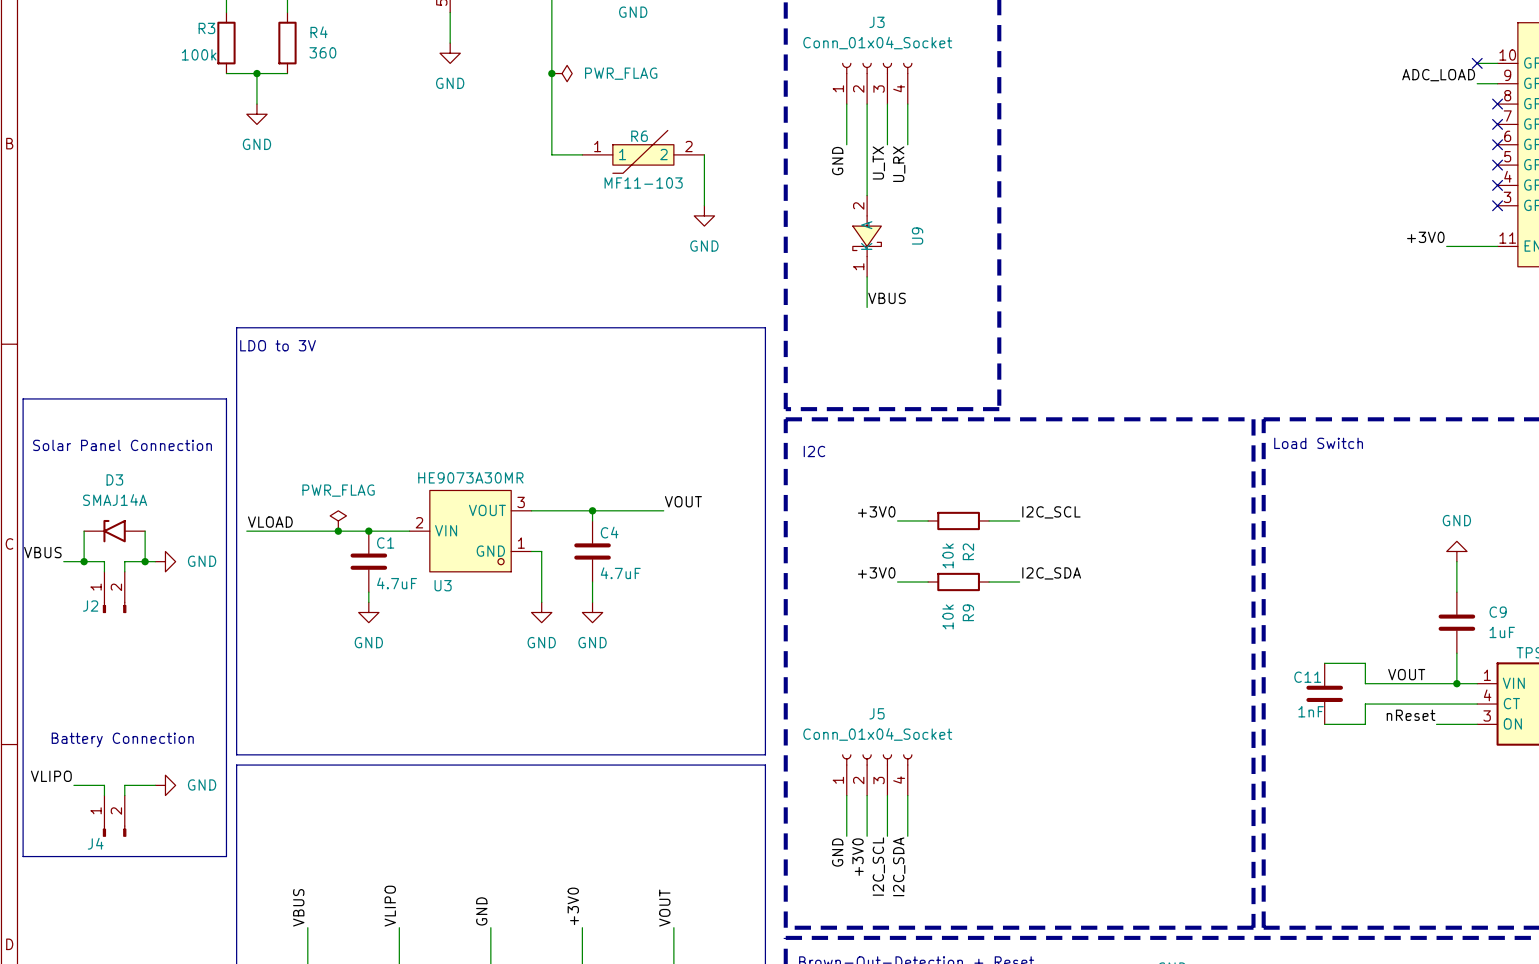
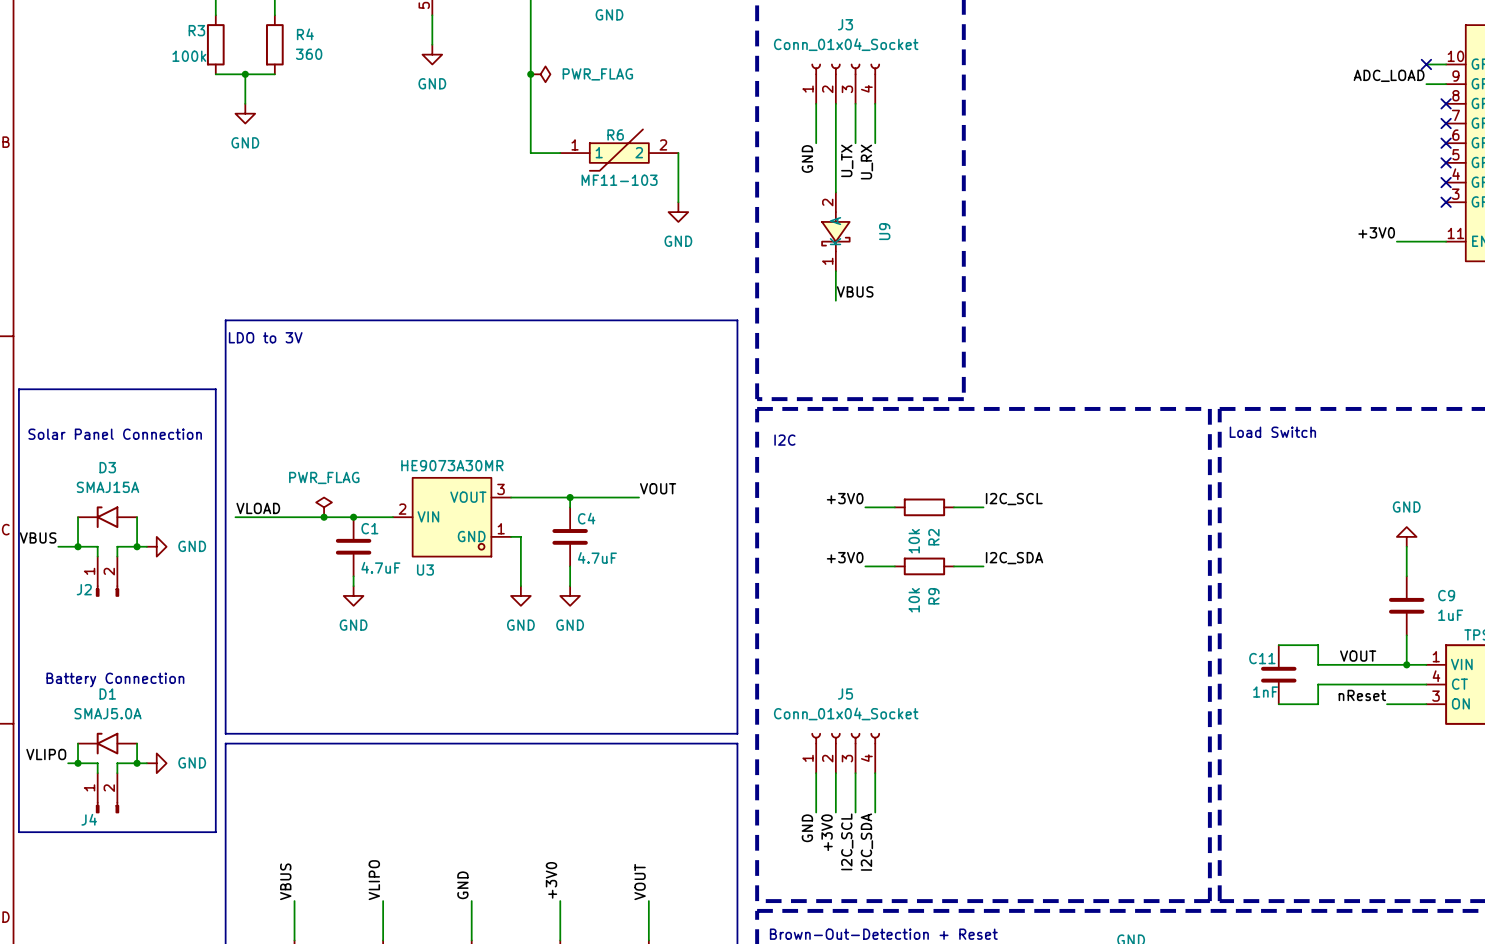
D3 value: SMAJ14A (115, 500) -> SMAJ15A (107, 487)
text position: Battery Connection (122, 739) -> Battery Connection (115, 679)
wire: none -> (78, 743) (78, 763)
D1: none -> SMAJ5.0A (107, 743)
wire: none -> (137, 743) (137, 763)
junction: none -> (78, 763)
junction: none -> (137, 763)

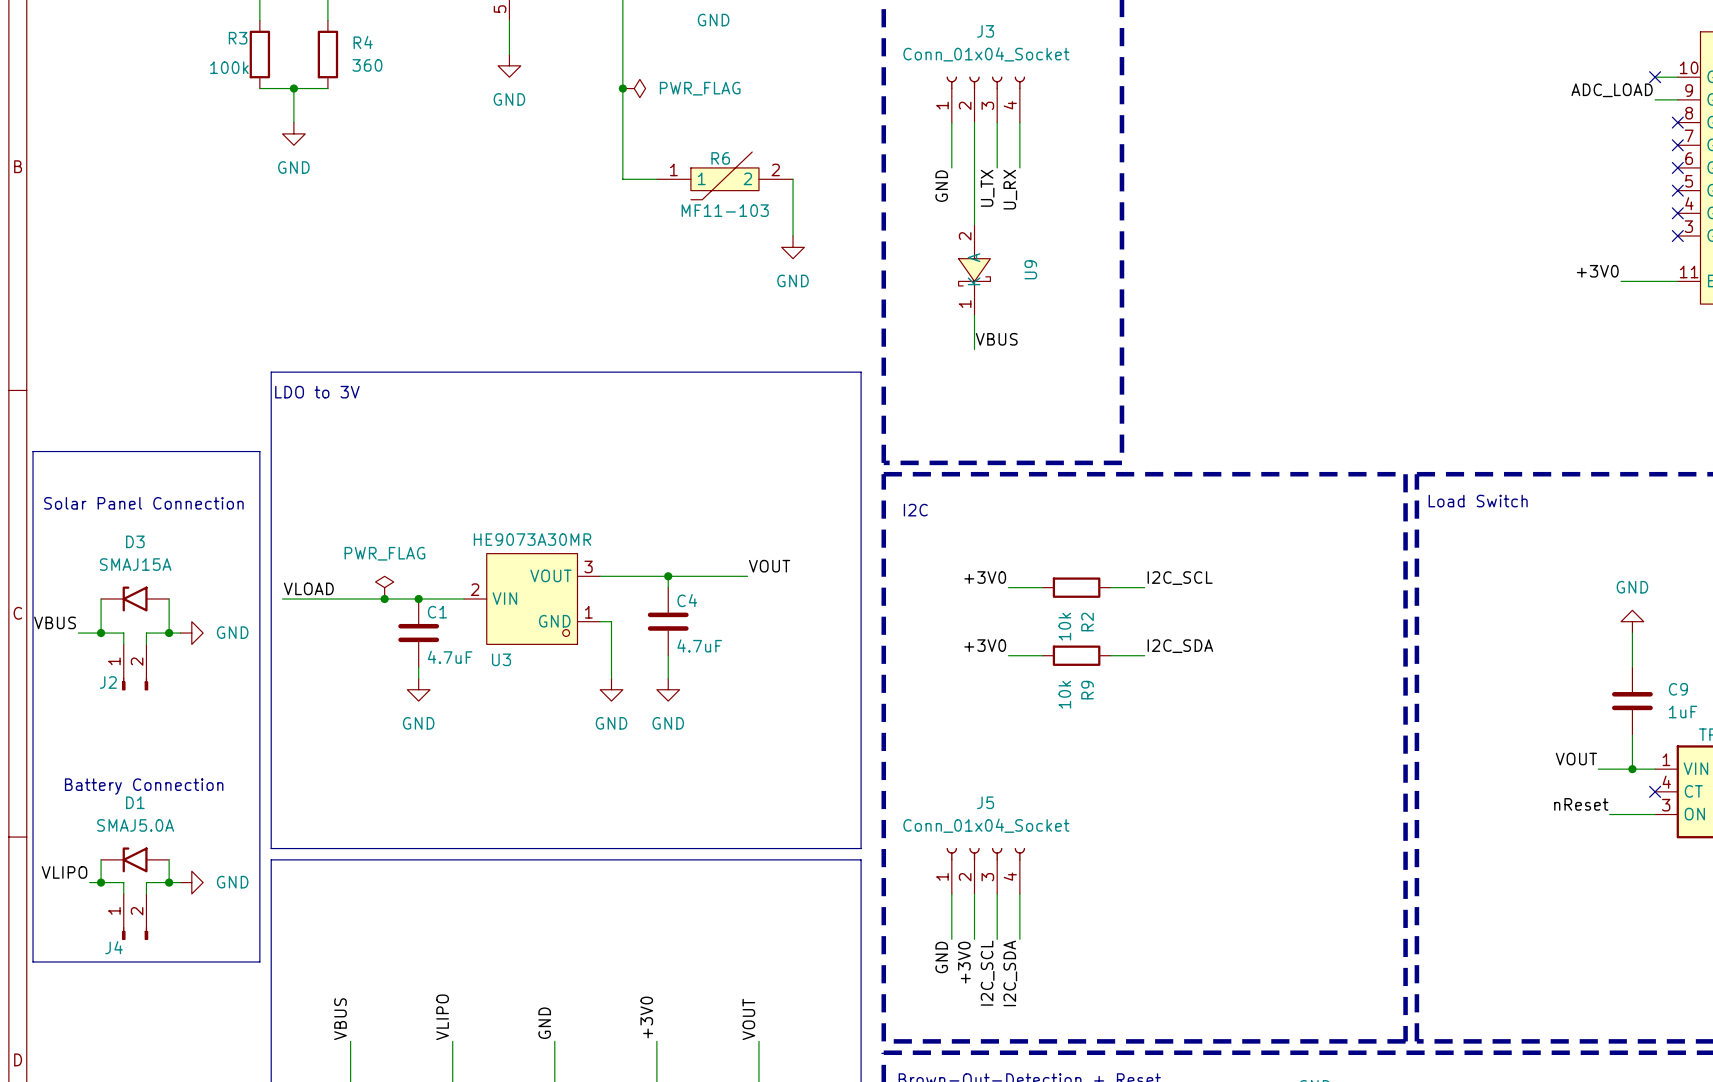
wire: (1278, 645) (1318, 645) (1318, 664) (1377, 664) -> none
C11: 1nF (1278, 674) -> none
wire: (1426, 684) (1318, 684) (1318, 704) (1278, 704) -> none
no-connect mark: none -> (1655, 791)

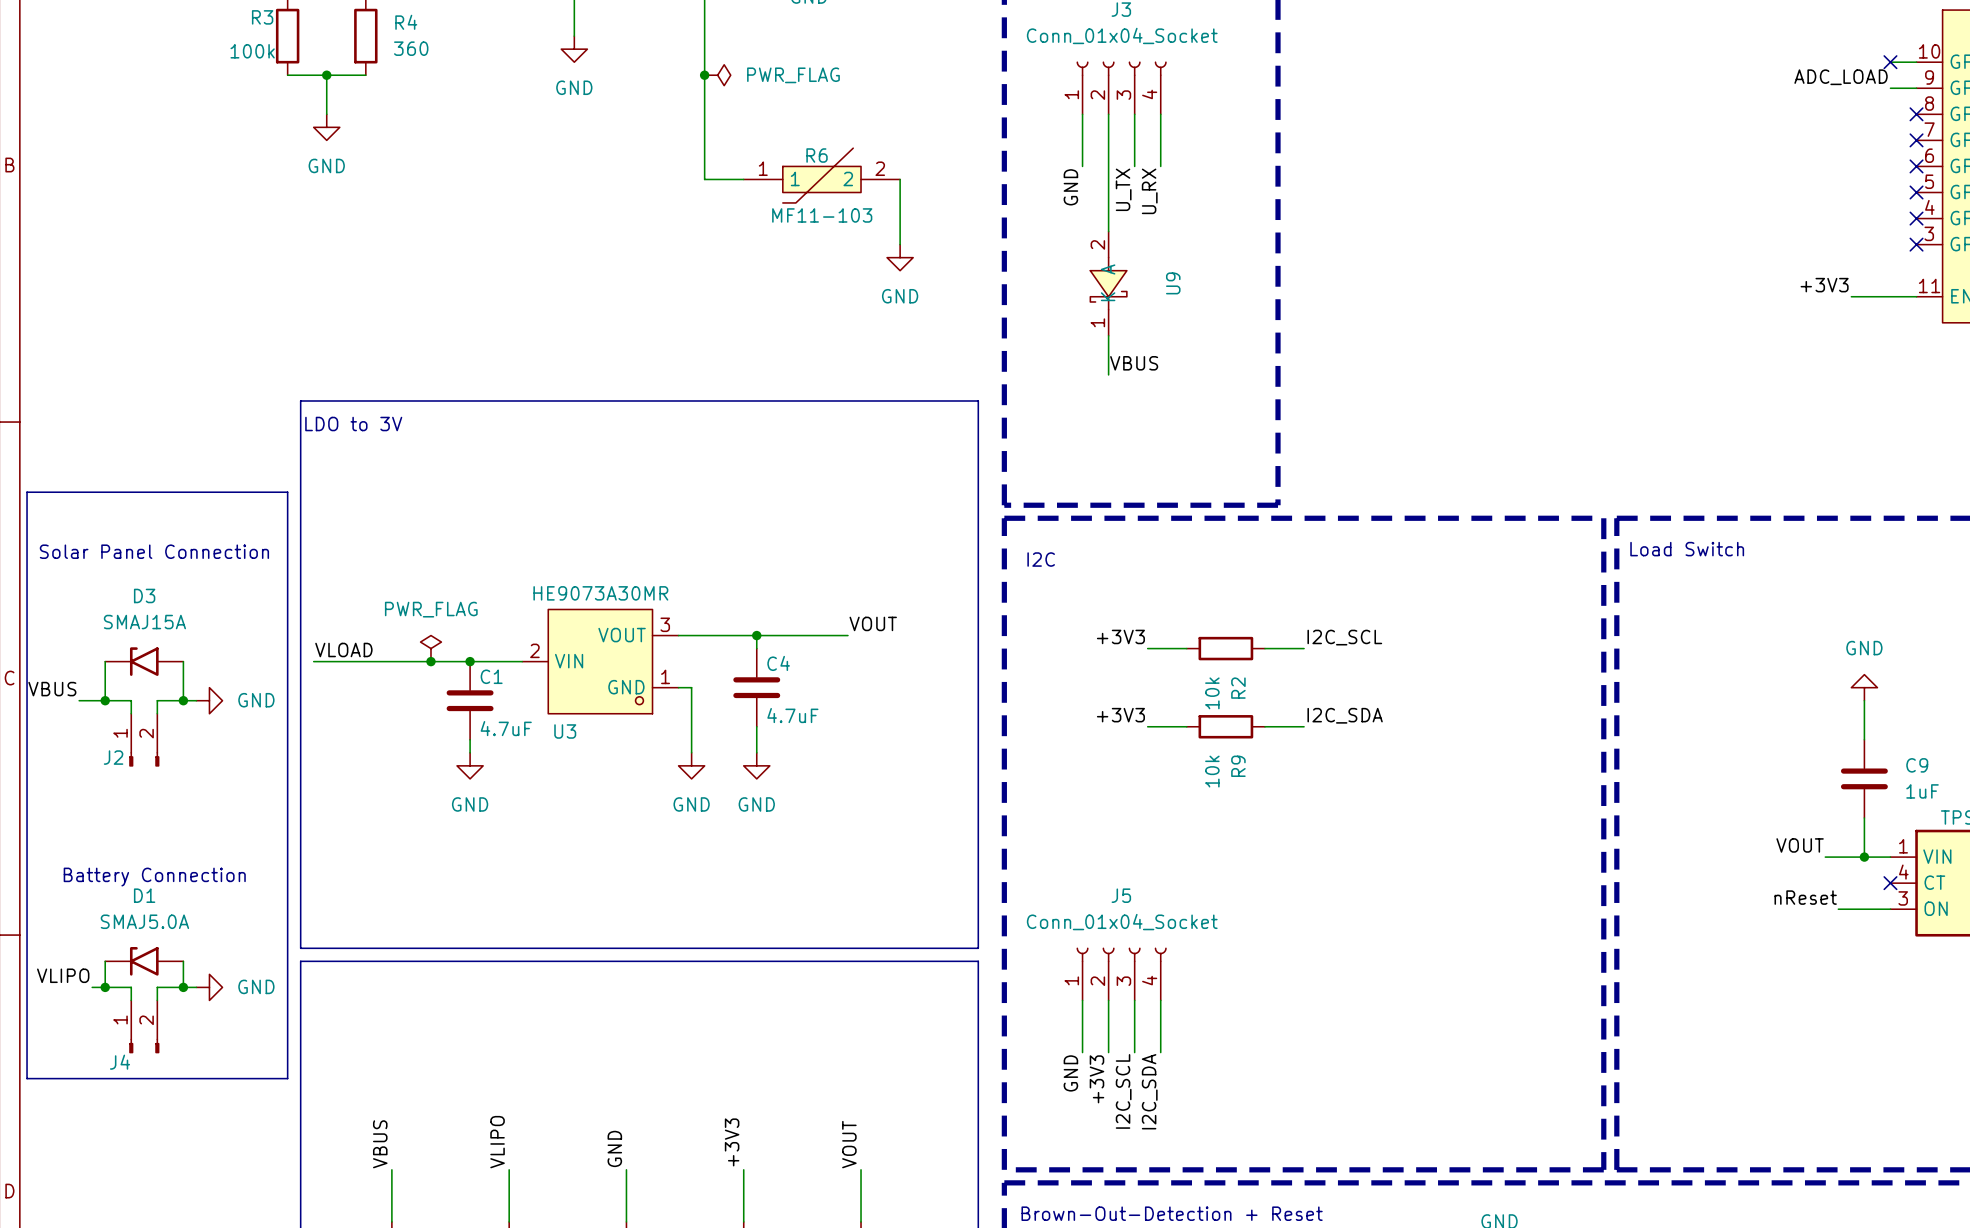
label: +3V0 (1597, 271) -> +3V3 (1824, 285)
label: +3V0 (985, 577) -> +3V3 (1120, 636)
label: +3V0 (985, 645) -> +3V3 (1120, 715)
label: +3V0 (964, 962) -> +3V3 (1096, 1079)
label: +3V0 (646, 1017) -> +3V3 (732, 1142)

